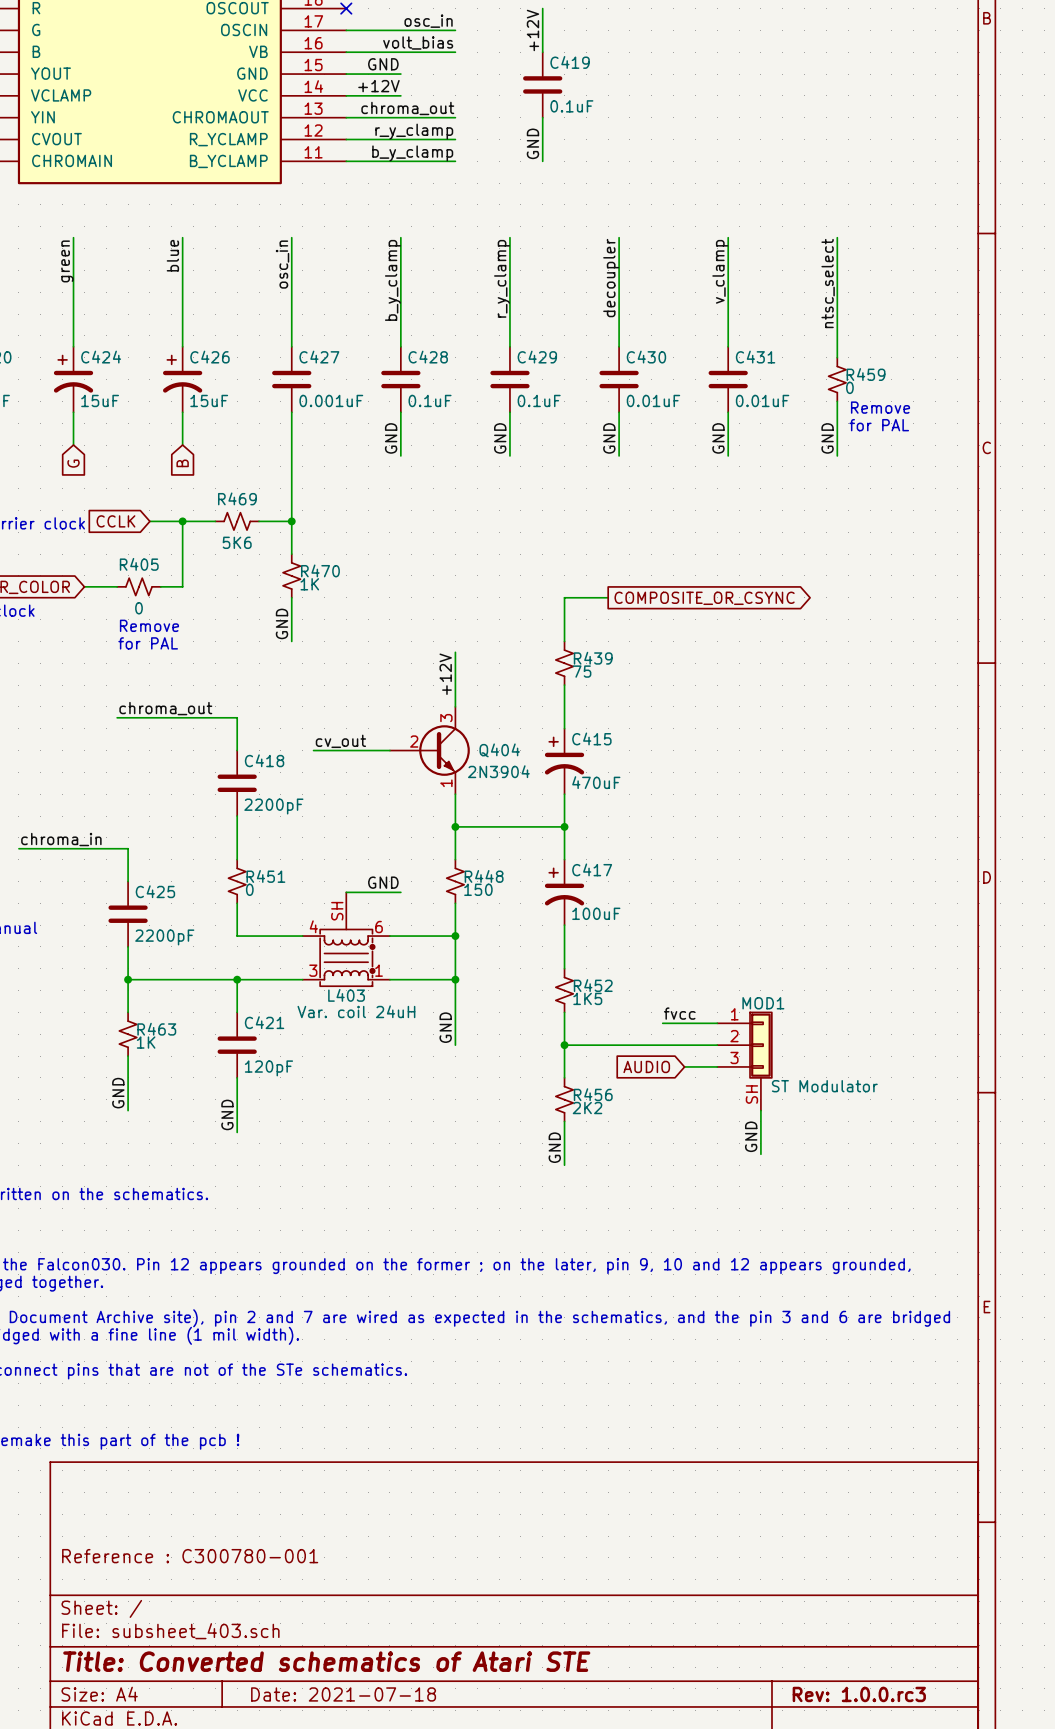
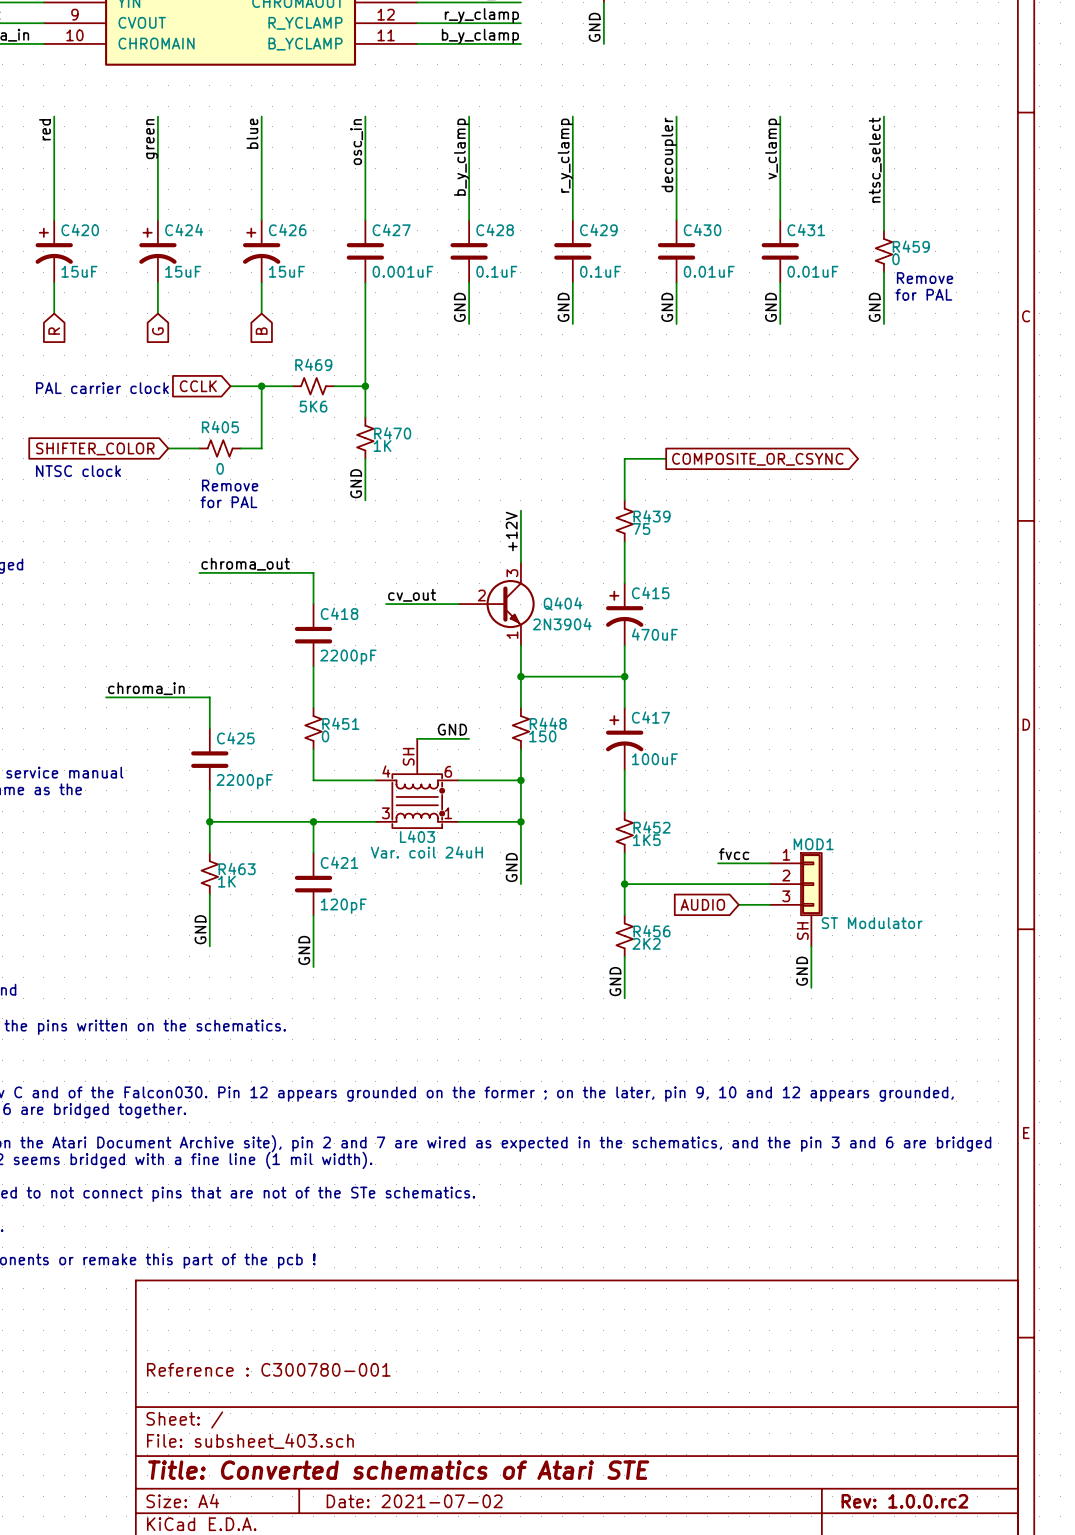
title block: Date: 2021-07-18 (343, 1694) -> Date: 2021-07-02 (414, 1501)
title block: Rev: 1.0.0.rc3 (859, 1694) -> Rev: 1.0.0.rc2 (904, 1501)

